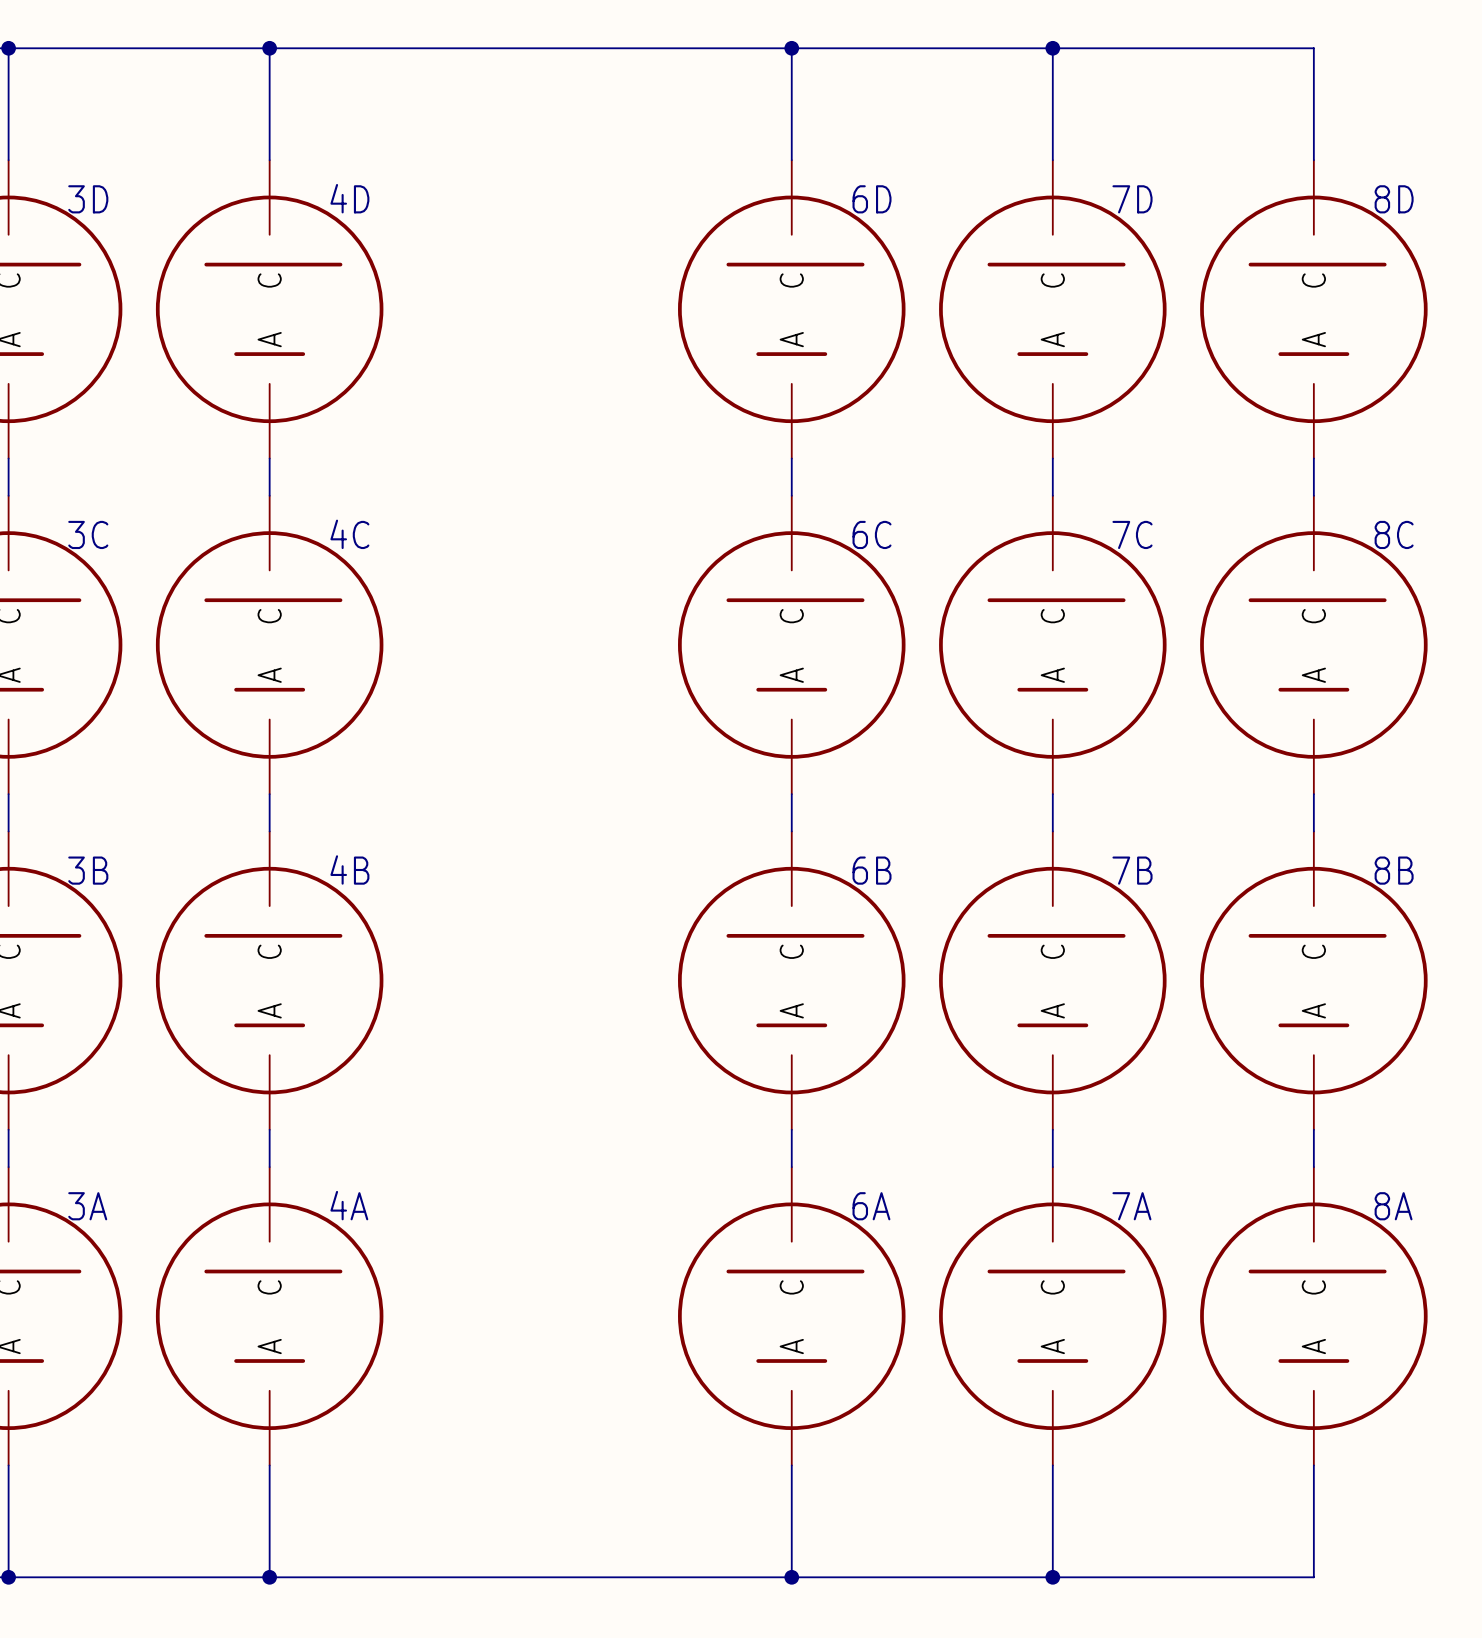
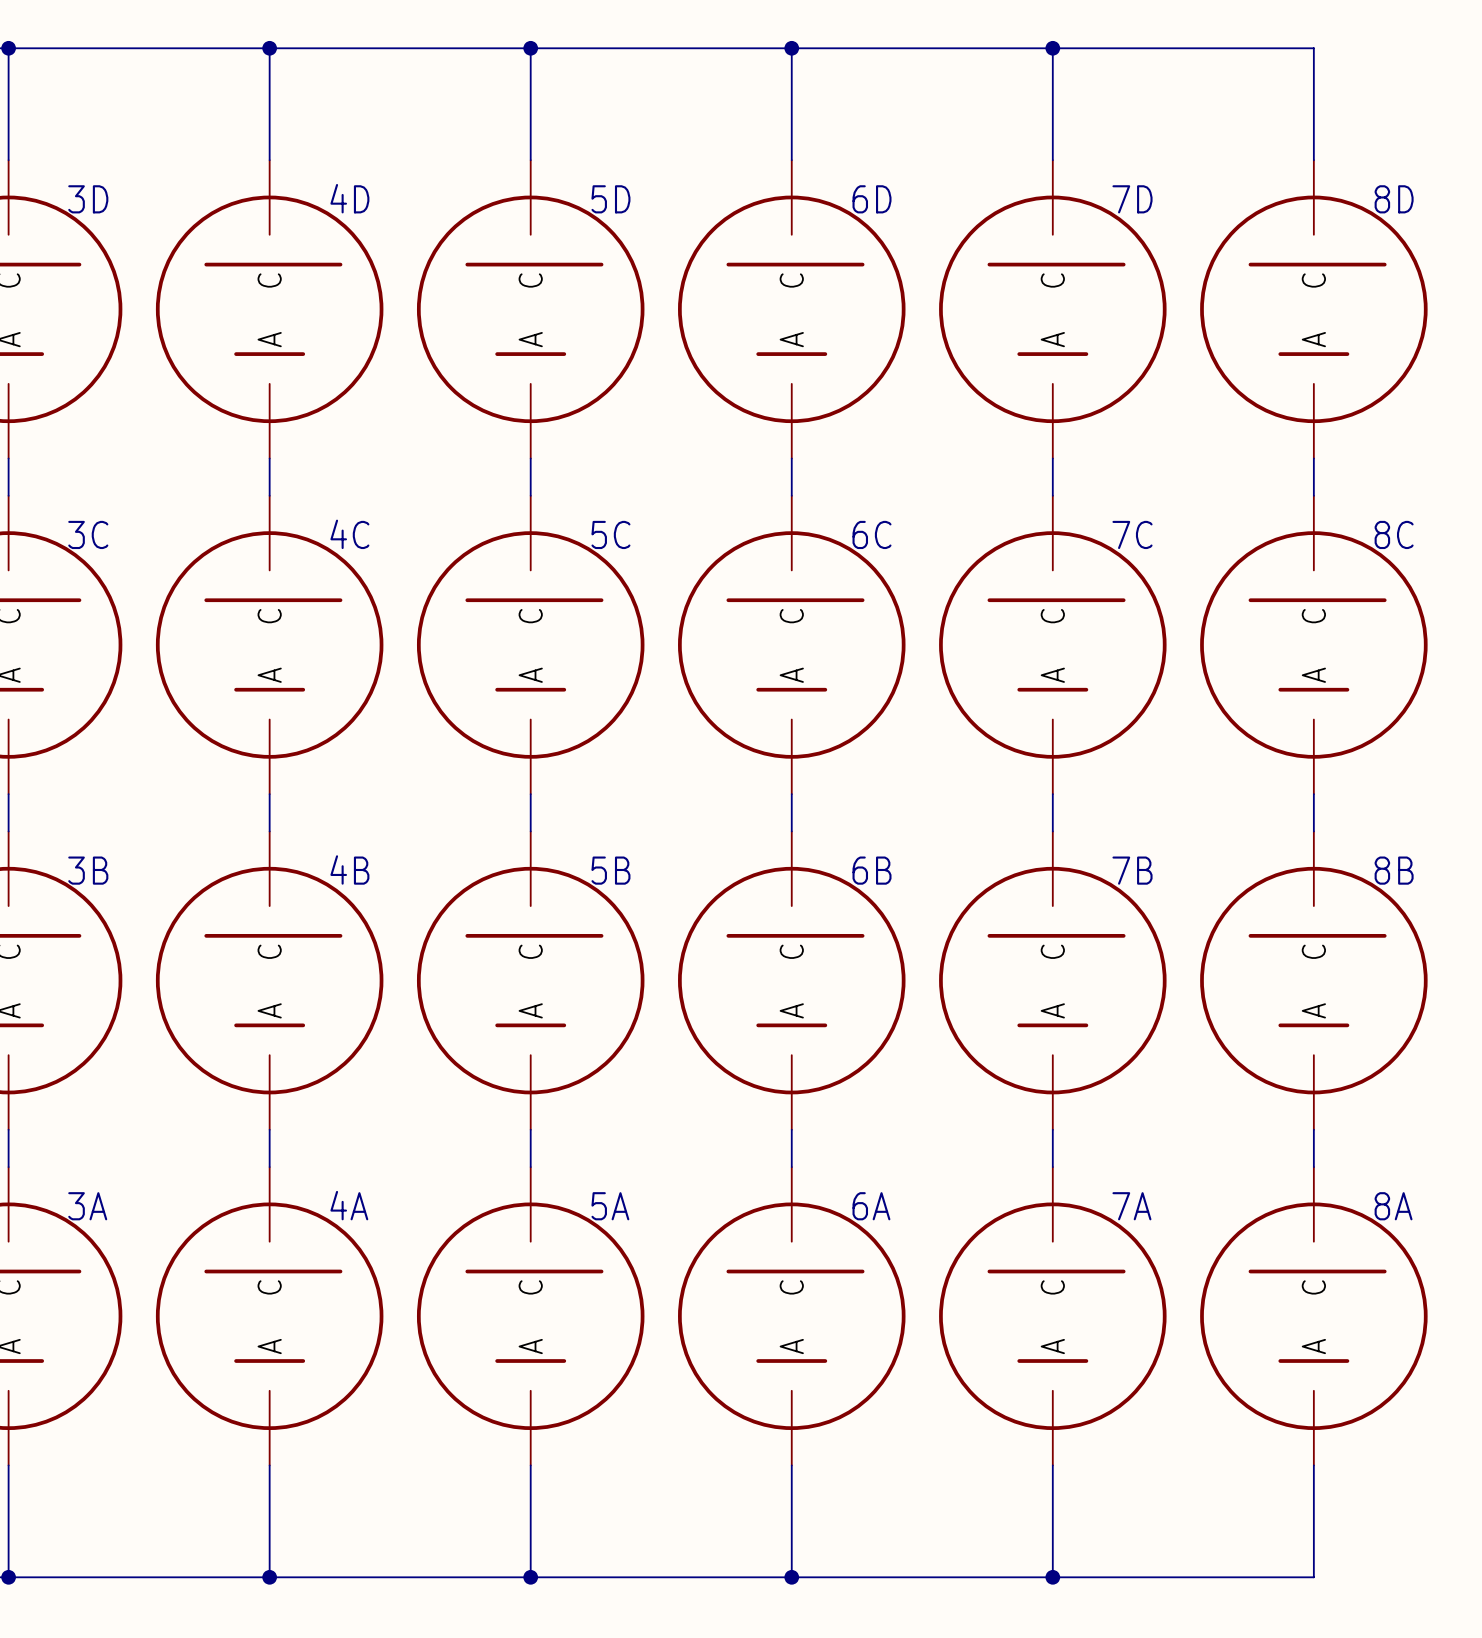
wire: none -> (530, 48) (530, 160)
junction: none -> (530, 48)
5D: none -> (530, 309)
wire: none -> (530, 458) (530, 495)
5C: none -> (530, 644)
wire: none -> (530, 794) (530, 831)
5B: none -> (530, 980)
wire: none -> (530, 1129) (530, 1167)
5A: none -> (530, 1316)
wire: none -> (530, 1465) (530, 1577)
junction: none -> (530, 1577)

